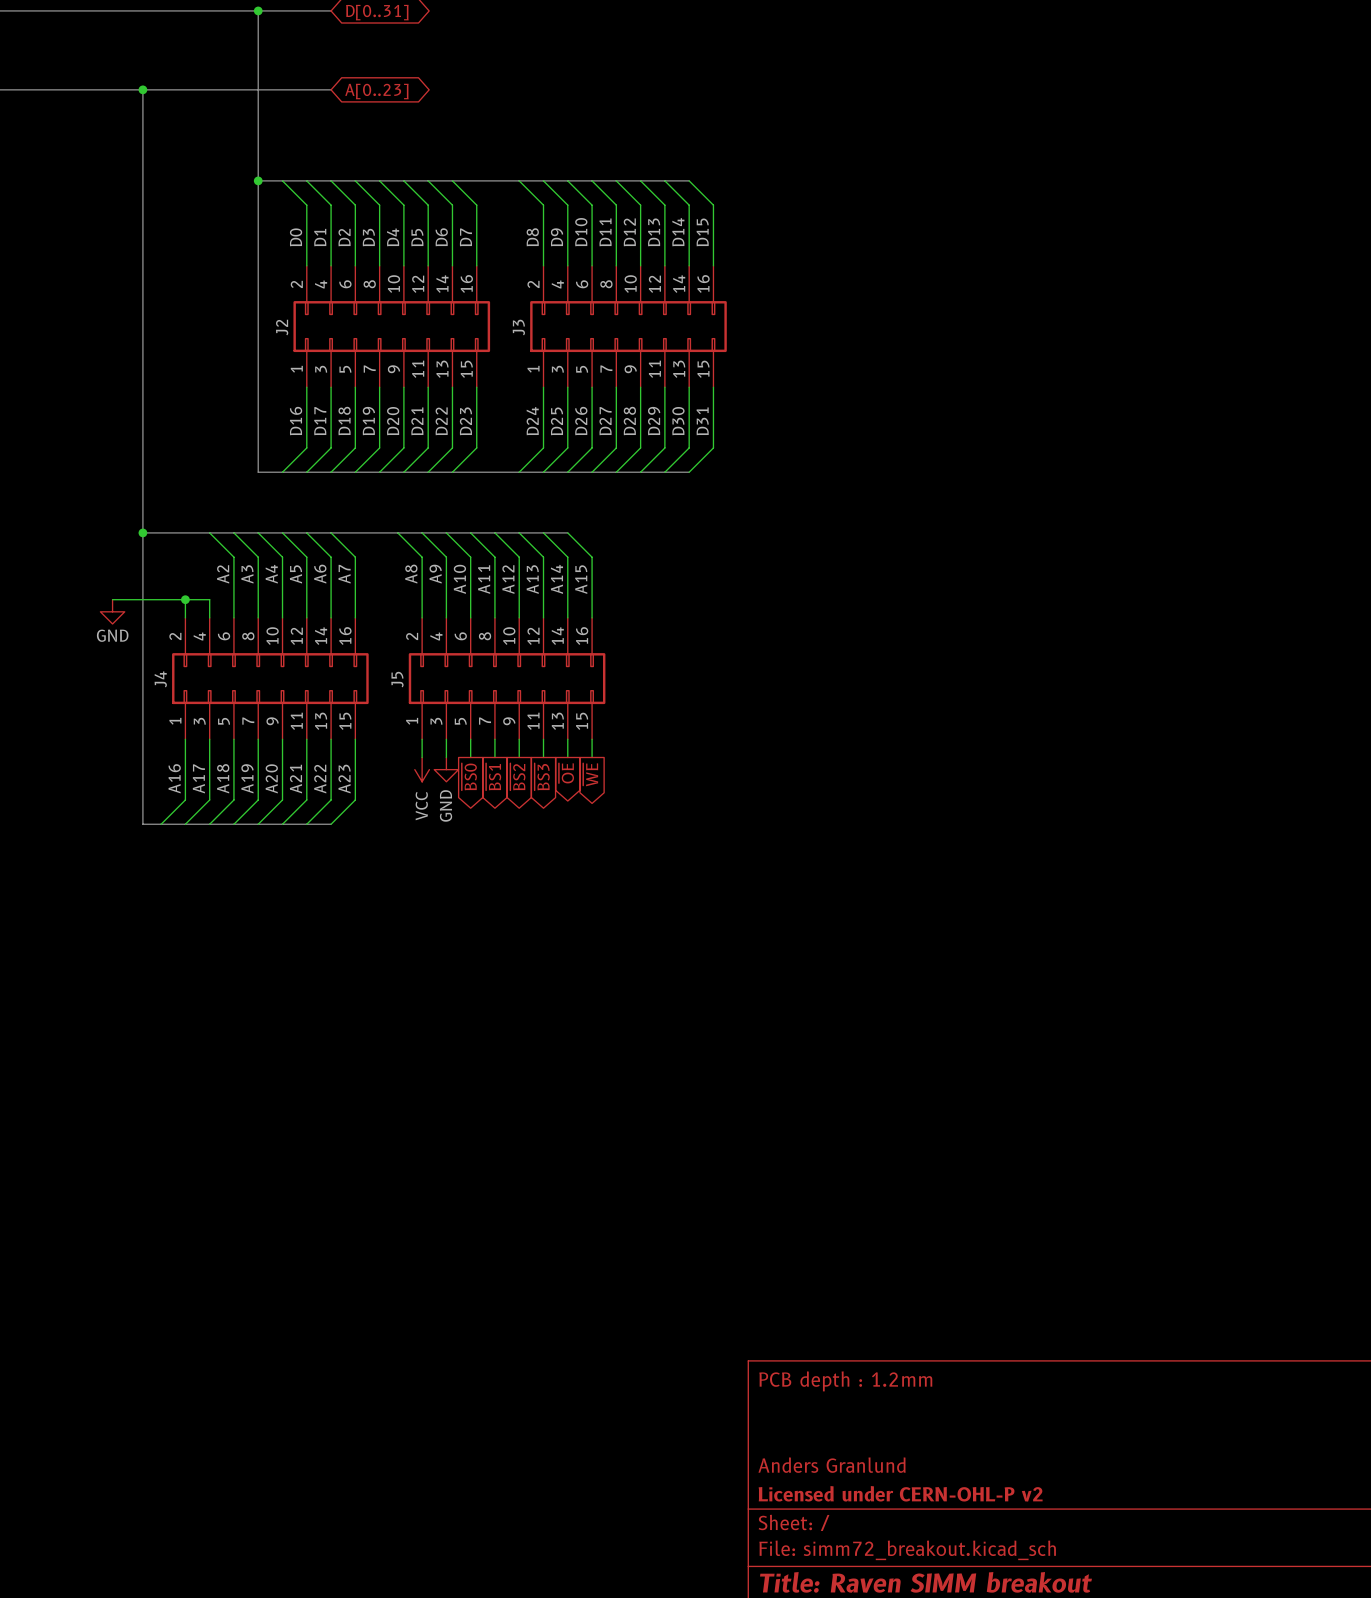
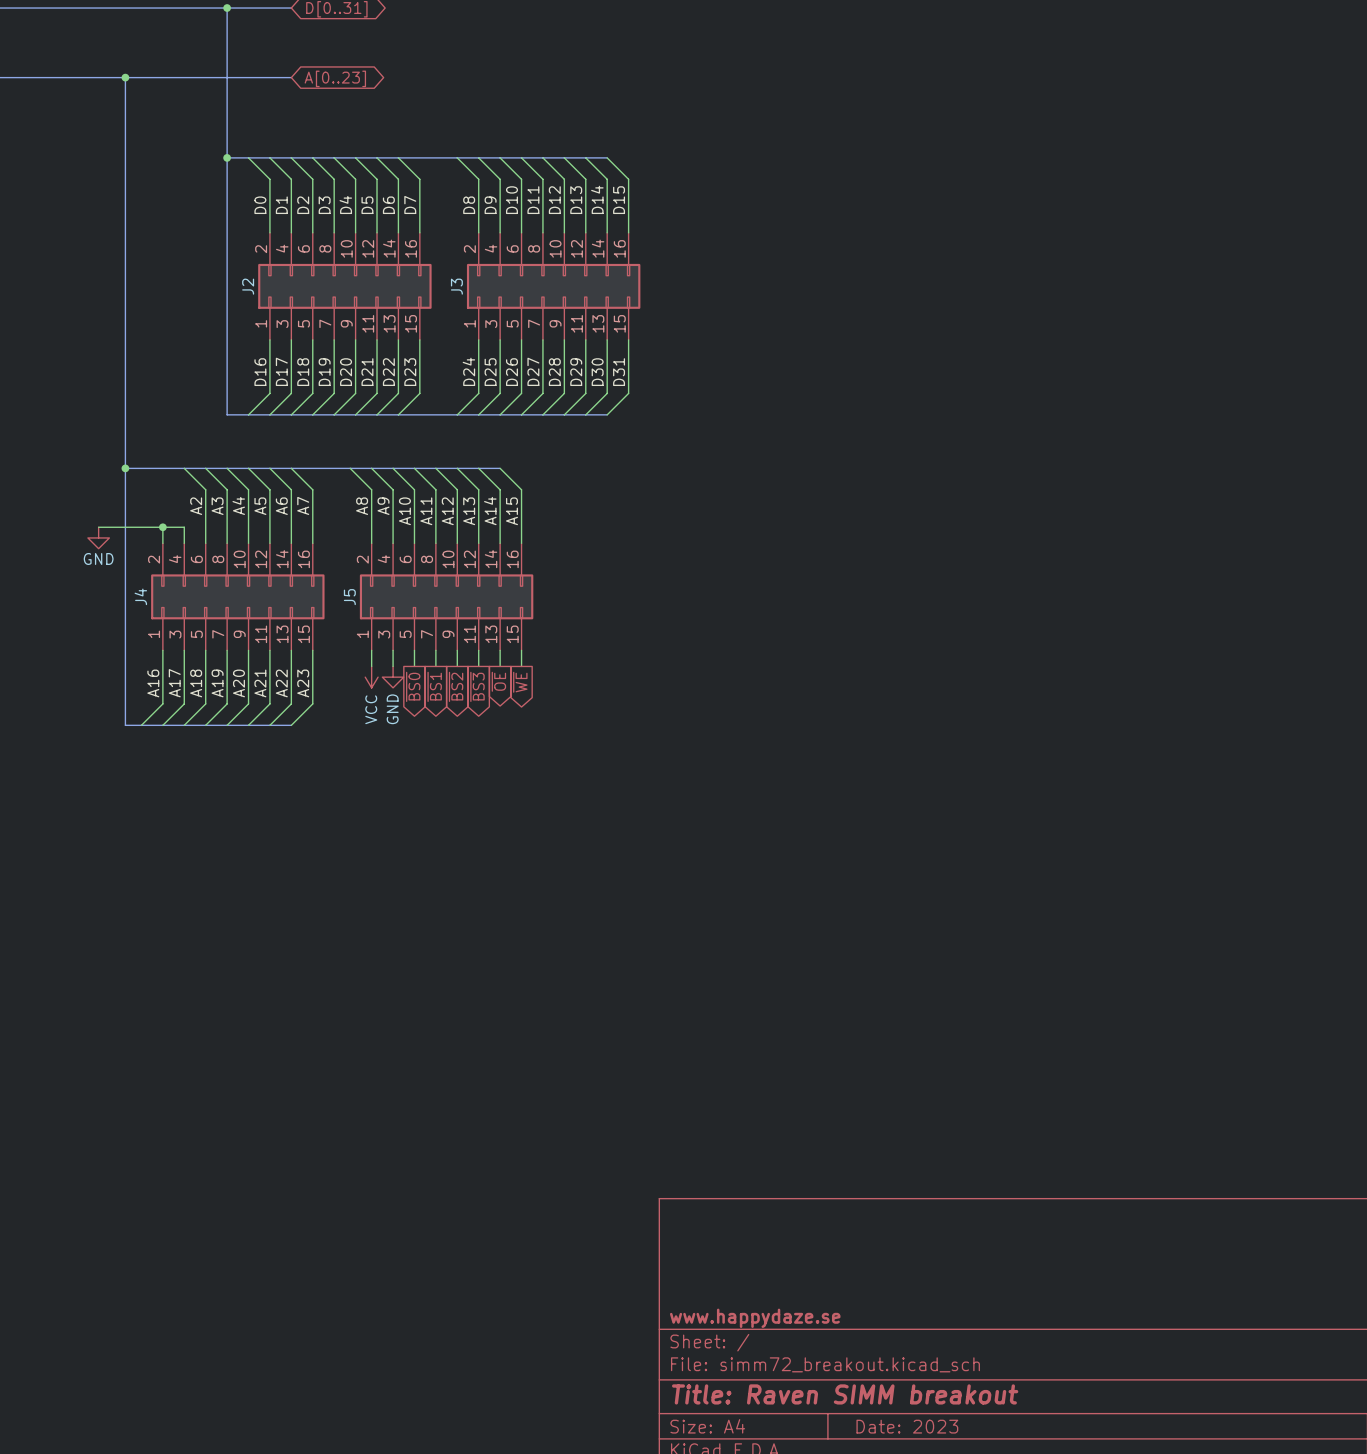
title block: PCB depth : 1.2mm (845, 1381) -> none
title block: Anders Granlund (832, 1465) -> none
title block: Licensed under CERN-OHL-P v2 (900, 1493) -> www.happydaze.se (755, 1318)

